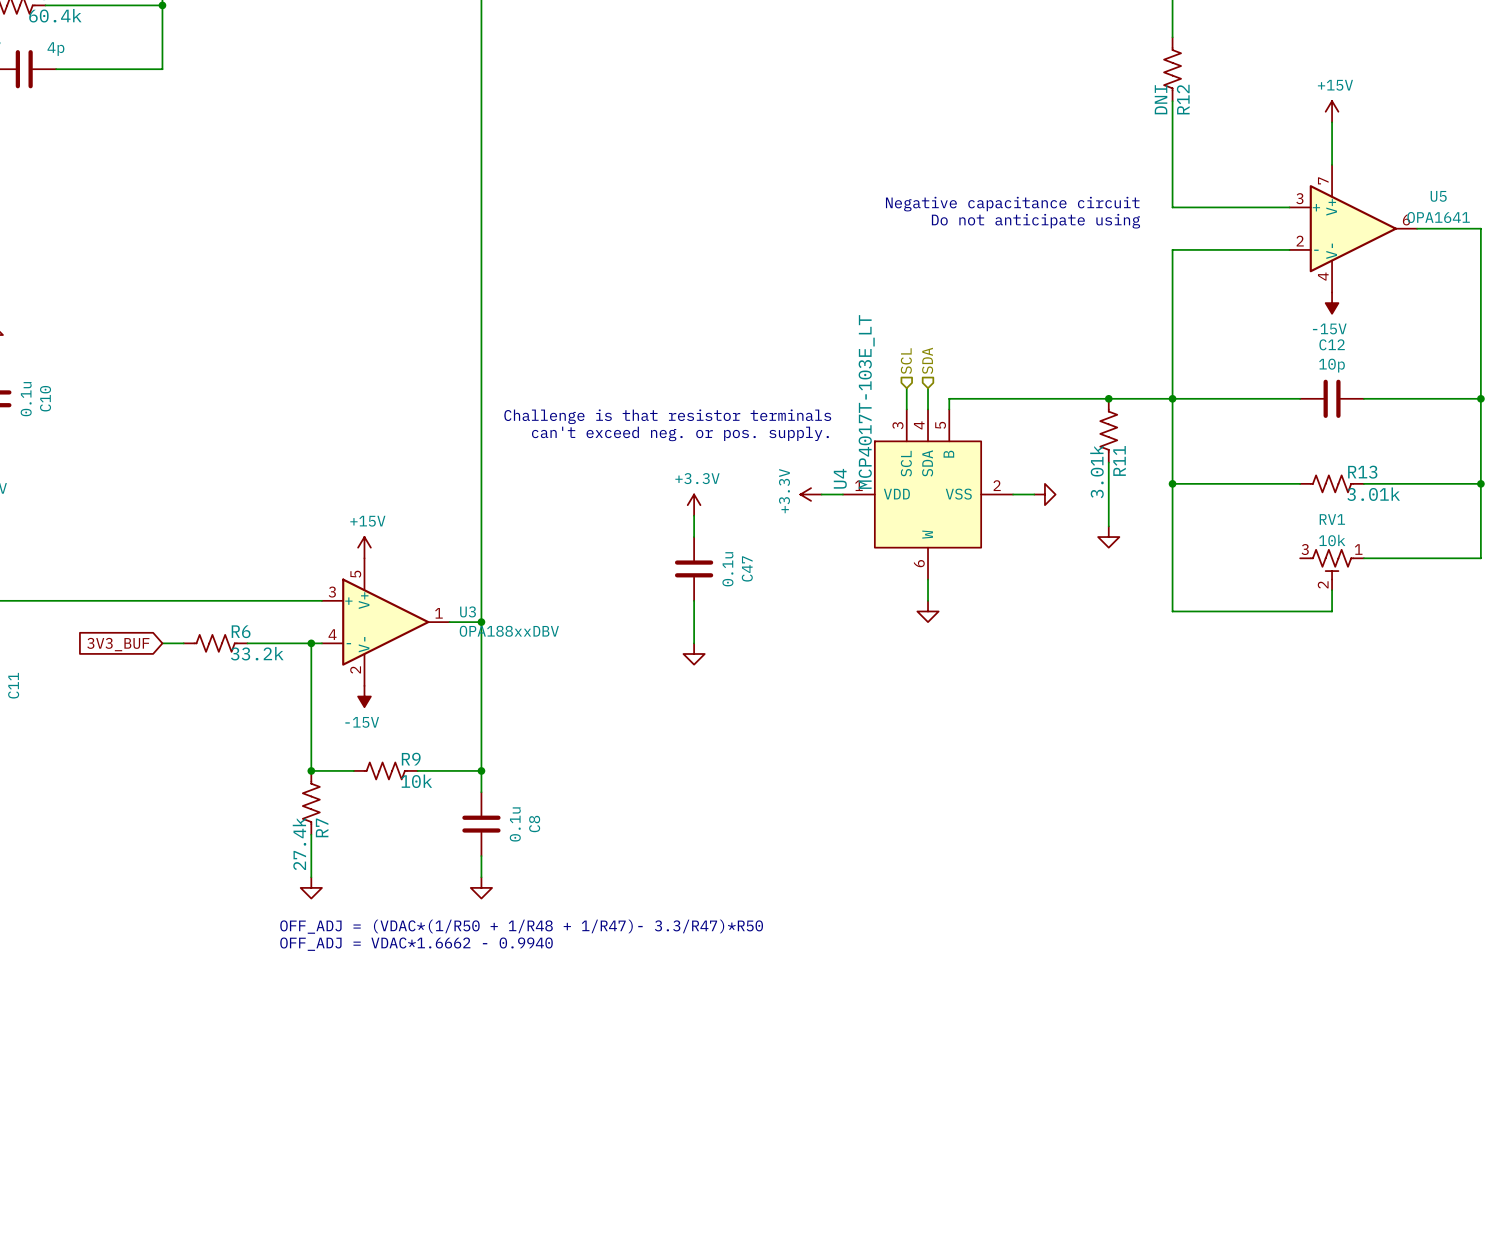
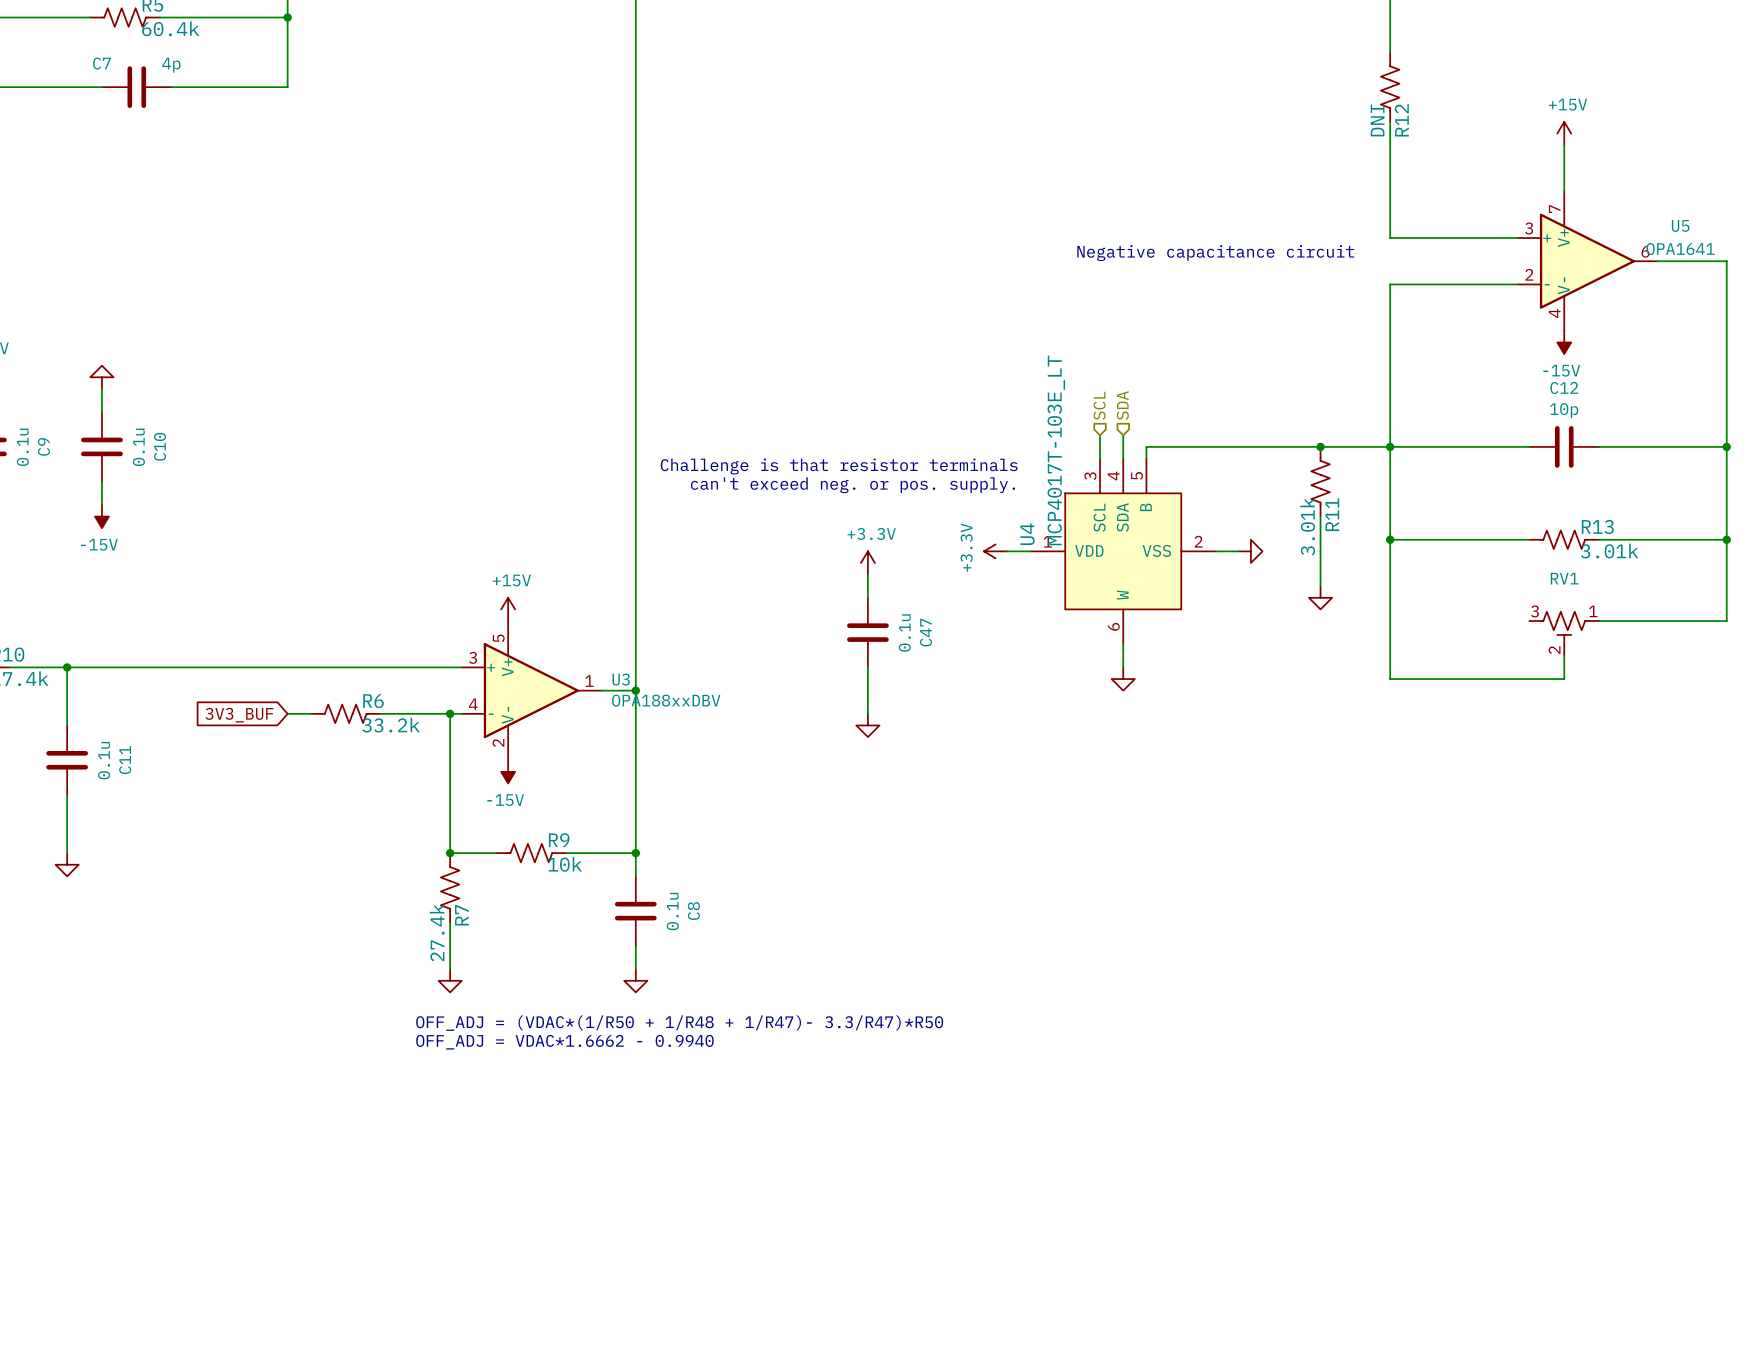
text: Negative capacitance circuit (1012, 204) -> none
text: Do not anticipate using (1035, 221) -> Negative capacitance circuit (1215, 253)
RV1 value: 10k (1332, 540) -> none

